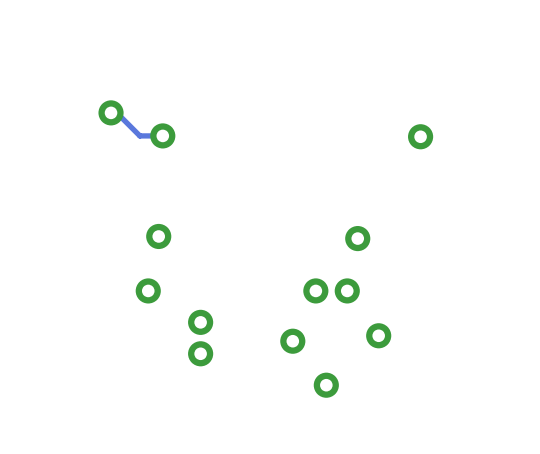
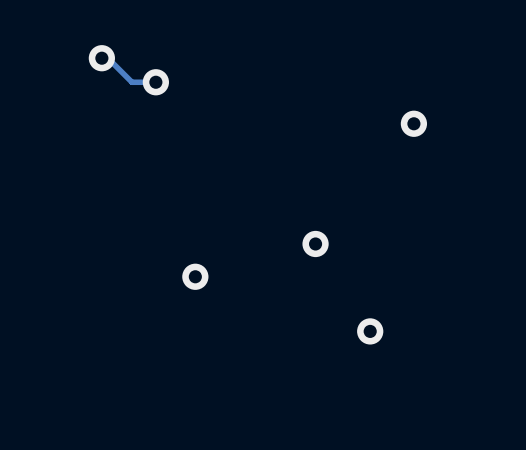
via position: (420, 136) -> (413, 123)
via: (158, 236) -> none
via: (357, 238) -> none
via: (148, 290) -> none
via: (347, 290) -> none
via: (378, 335) -> none
via: (292, 341) -> none
via: (200, 353) -> none
via: none -> (370, 331)
via: (326, 385) -> none

